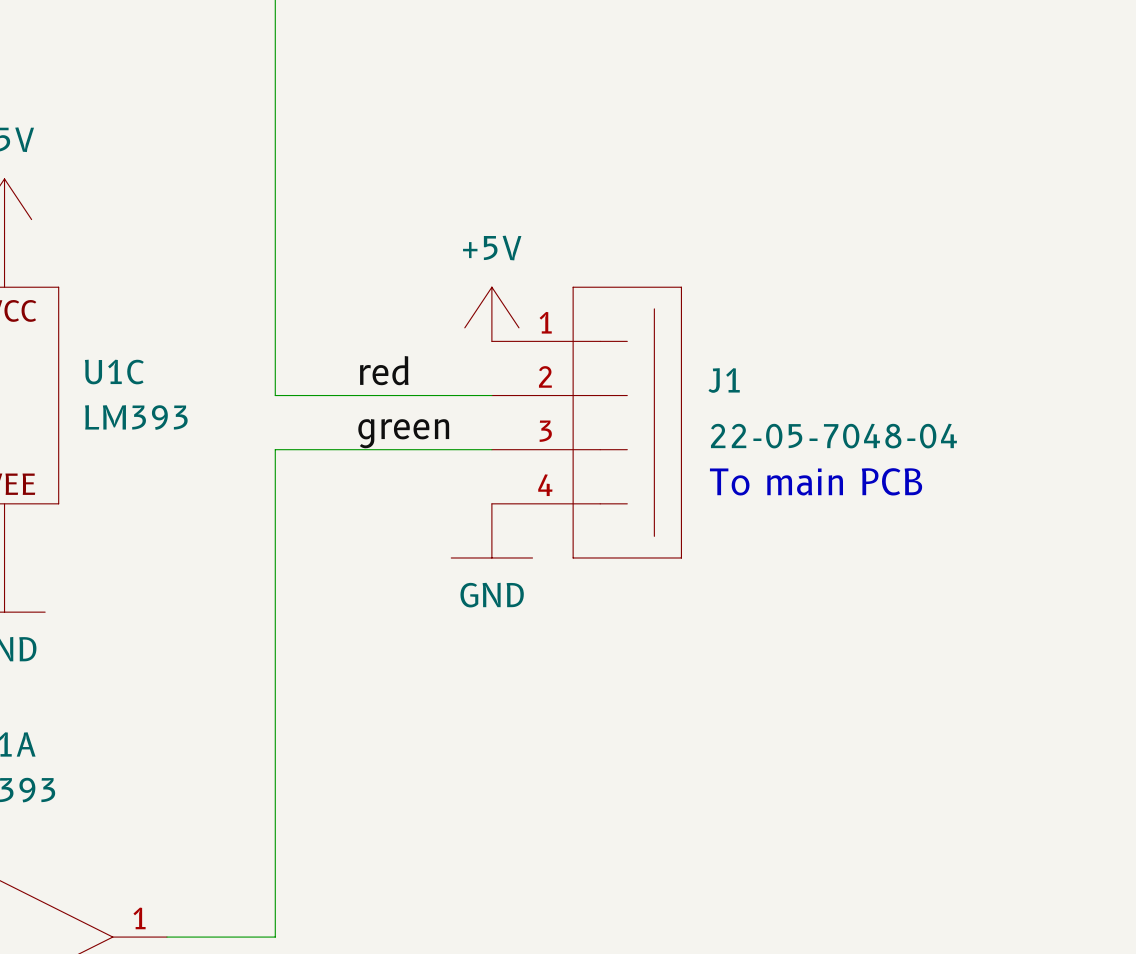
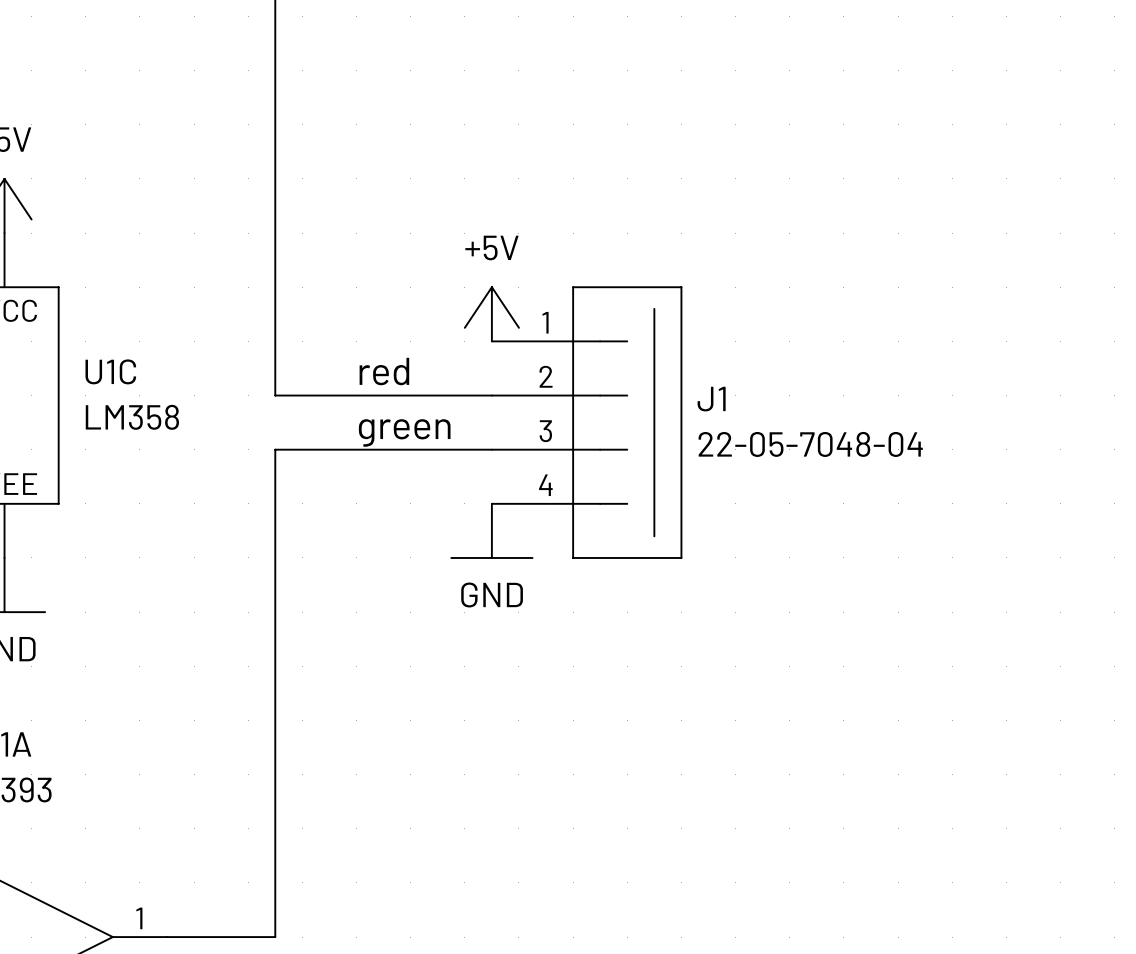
J1 name position: J1 (724, 380) -> J1 (711, 399)
U1C value: LM393 (136, 417) -> LM358 (132, 417)
J1 value position: 22-05-7048-04 (833, 436) -> 22-05-7048-04 (810, 444)
text: To main PCB (816, 481) -> none

